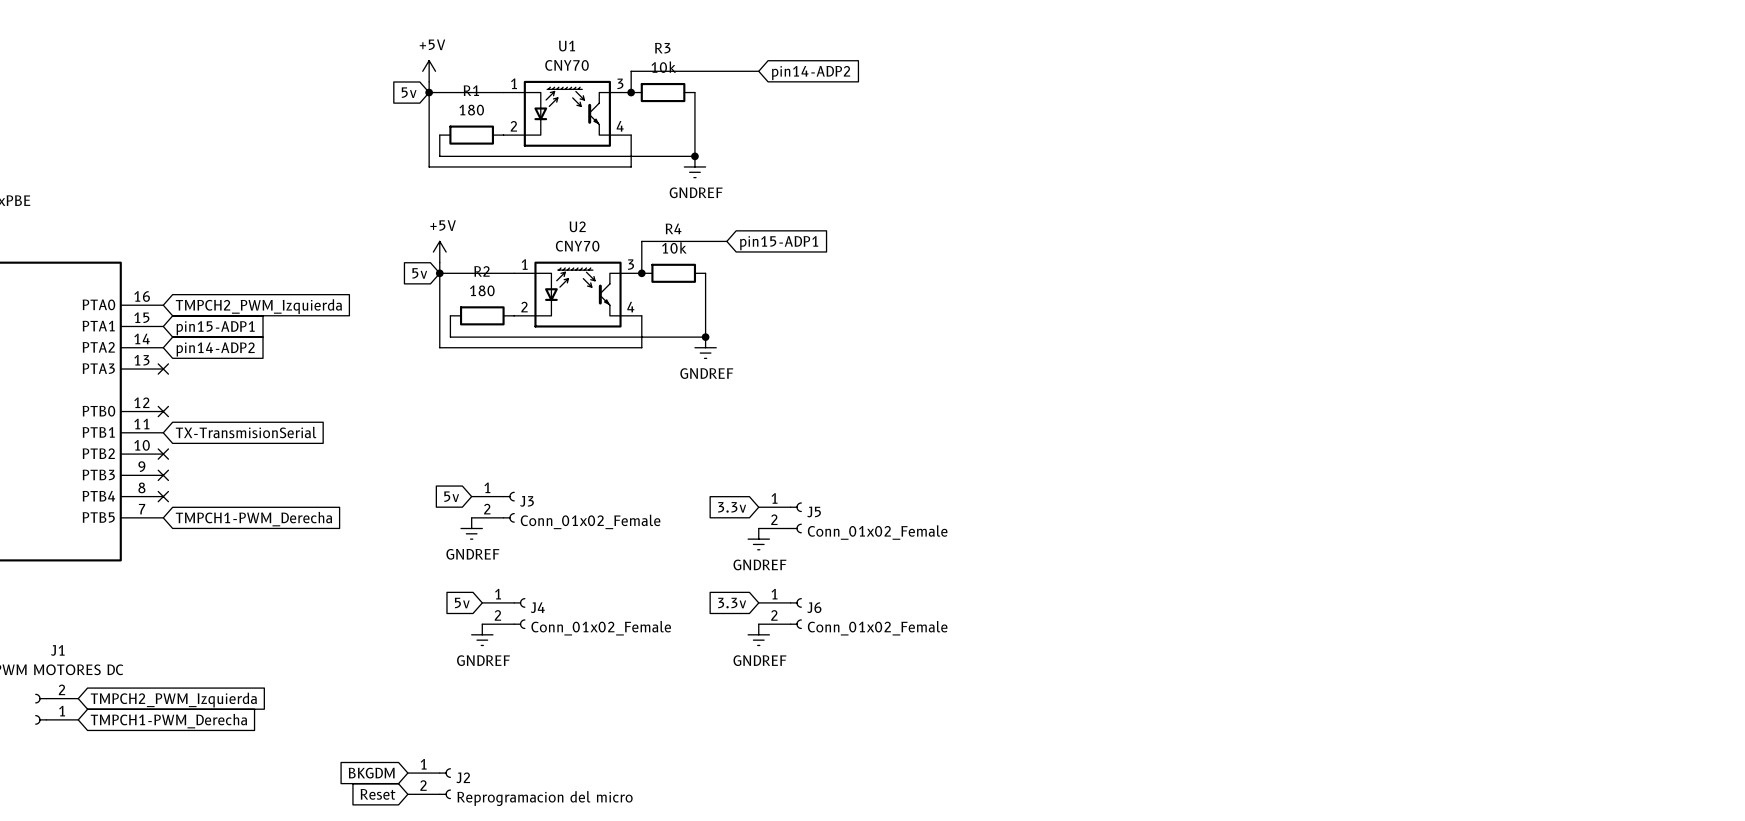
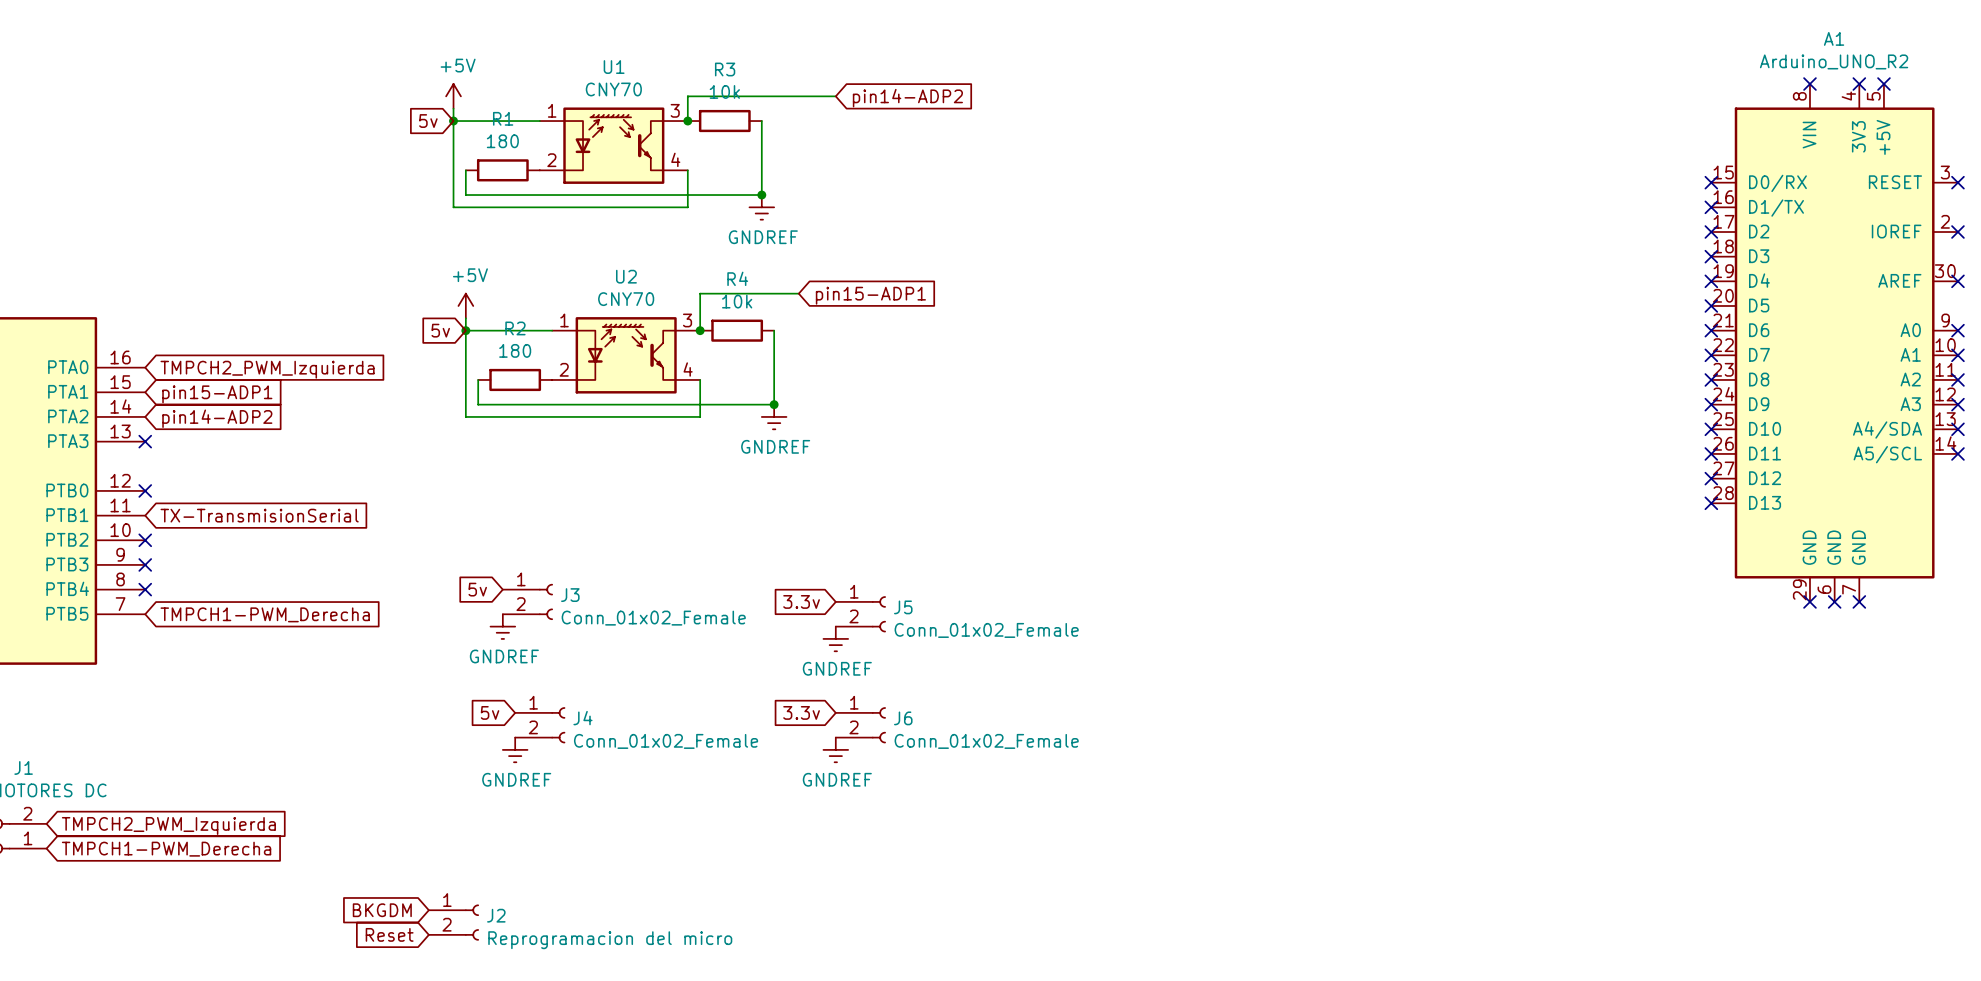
no-connect mark: none -> (1809, 84)
no-connect mark: none -> (1859, 84)
no-connect mark: none -> (1883, 84)
no-connect mark: none -> (1711, 182)
no-connect mark: none -> (1957, 182)
no-connect mark: none -> (1711, 207)
no-connect mark: none -> (1711, 232)
no-connect mark: none -> (1957, 232)
no-connect mark: none -> (1711, 256)
no-connect mark: none -> (1711, 281)
no-connect mark: none -> (1957, 281)
no-connect mark: none -> (1711, 305)
no-connect mark: none -> (1711, 330)
no-connect mark: none -> (1957, 330)
A1: none -> Arduino_UNO_R2 (1834, 342)
no-connect mark: none -> (1711, 355)
no-connect mark: none -> (1957, 355)
no-connect mark: none -> (1711, 379)
no-connect mark: none -> (1957, 379)
no-connect mark: none -> (1711, 404)
no-connect mark: none -> (1957, 404)
no-connect mark: none -> (1711, 429)
no-connect mark: none -> (1957, 429)
no-connect mark: none -> (1711, 453)
no-connect mark: none -> (1957, 453)
no-connect mark: none -> (1711, 478)
no-connect mark: none -> (1711, 503)
no-connect mark: none -> (1809, 601)
no-connect mark: none -> (1834, 601)
no-connect mark: none -> (1859, 601)

